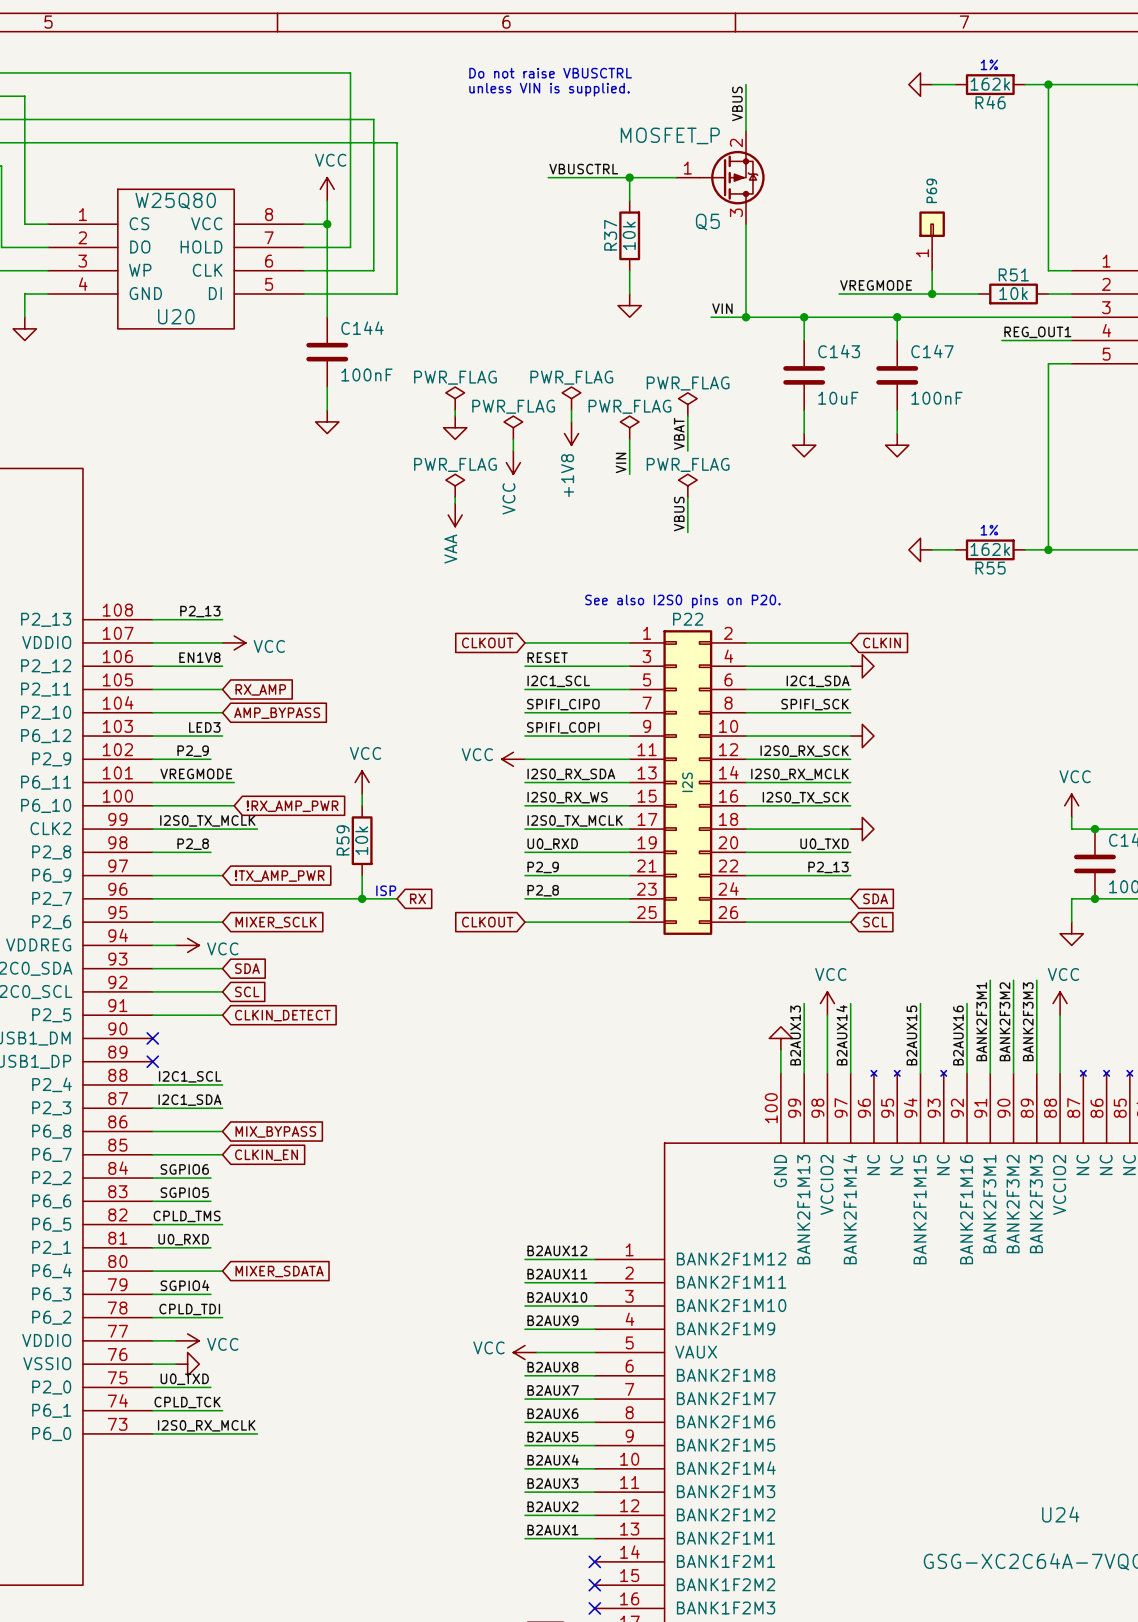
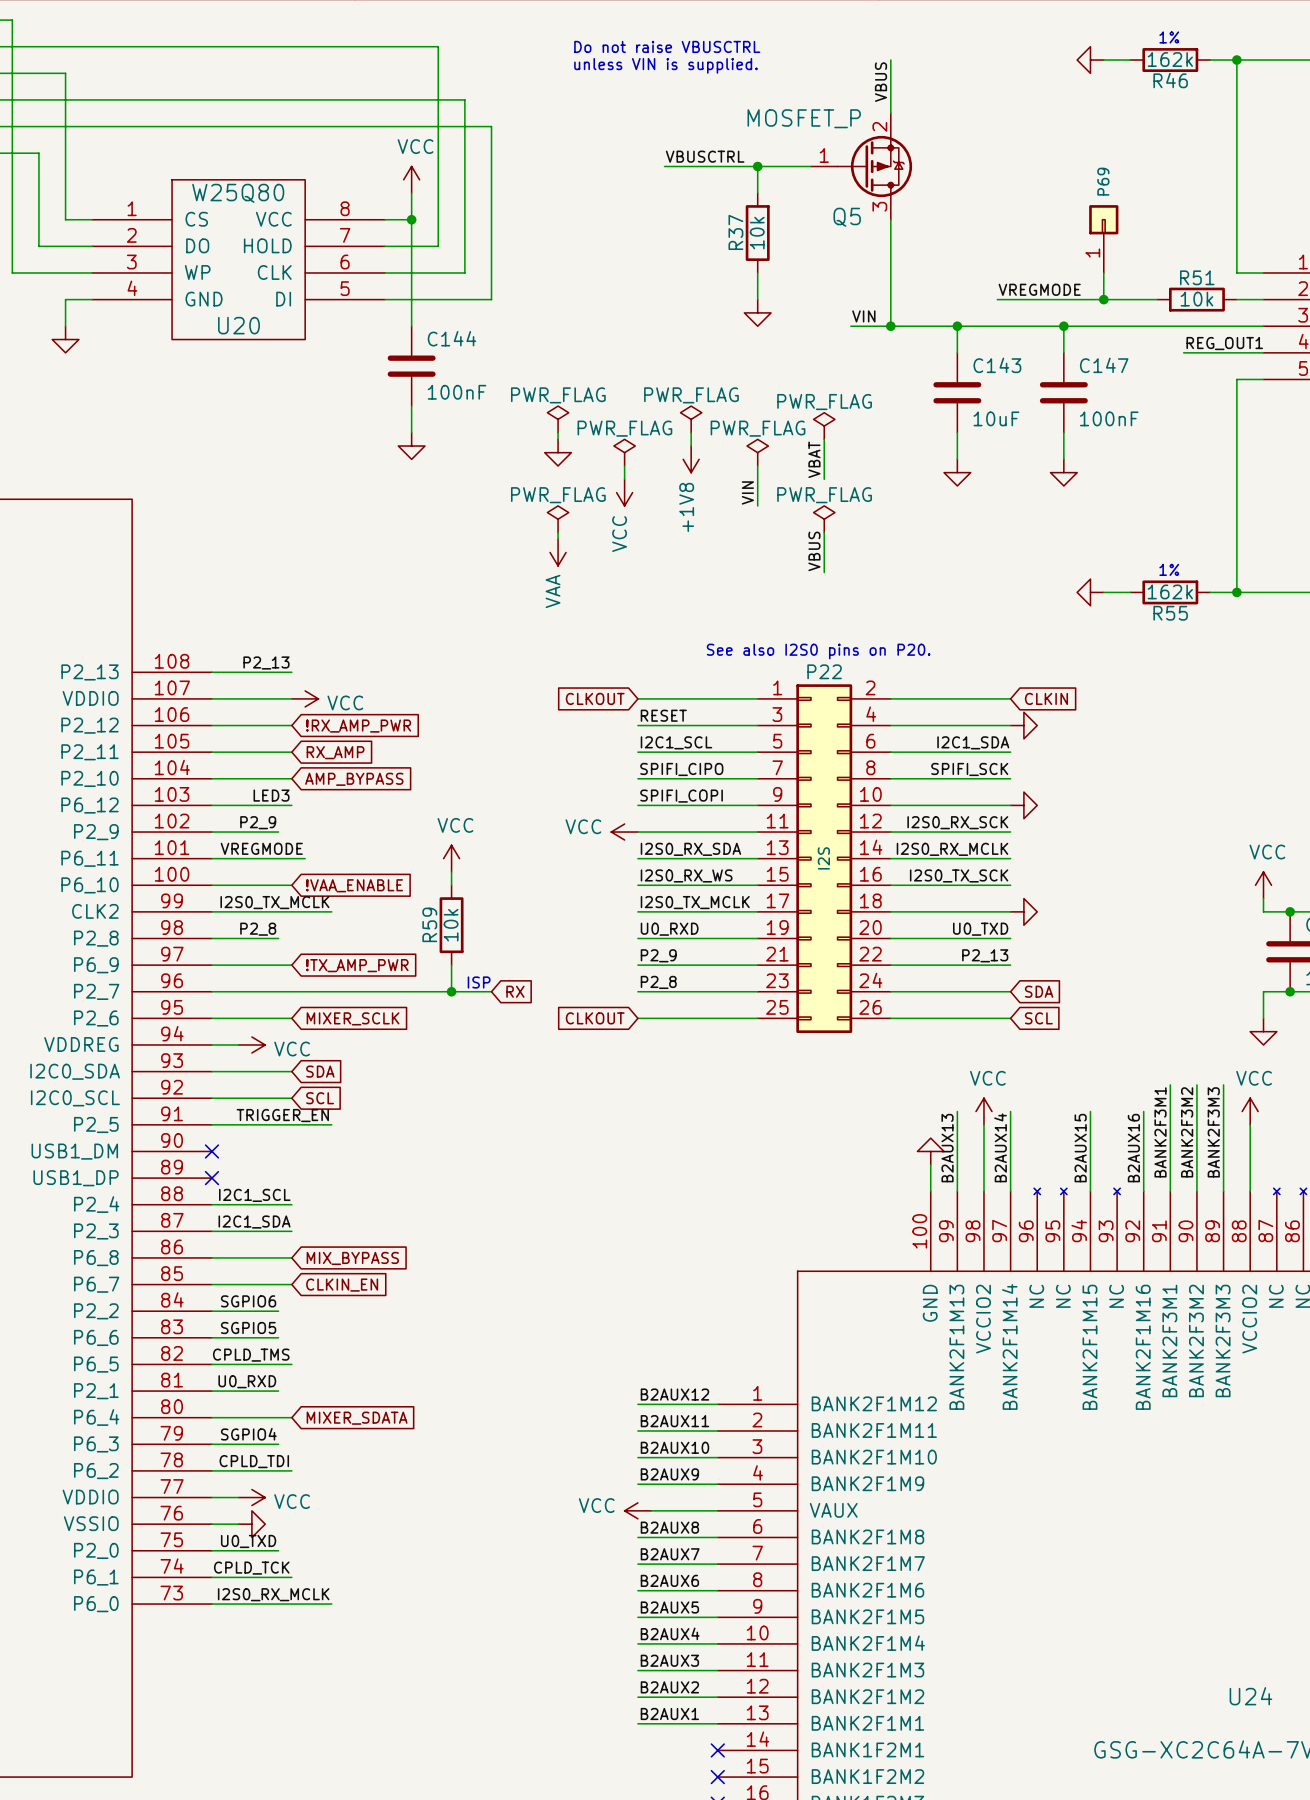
label: EN1V8 (199, 657) -> none
wire: (222, 805) (234, 805) -> none
global label: none -> !VAA_ENABLE (354, 885)
global label position: !RX_AMP_PWR (292, 806) -> !RX_AMP_PWR (358, 726)
label: none -> TRIGGER_EN (282, 1115)
wire: none -> (291, 1124) (331, 1124)
global label: CLKIN_DETECT (282, 1015) -> none

